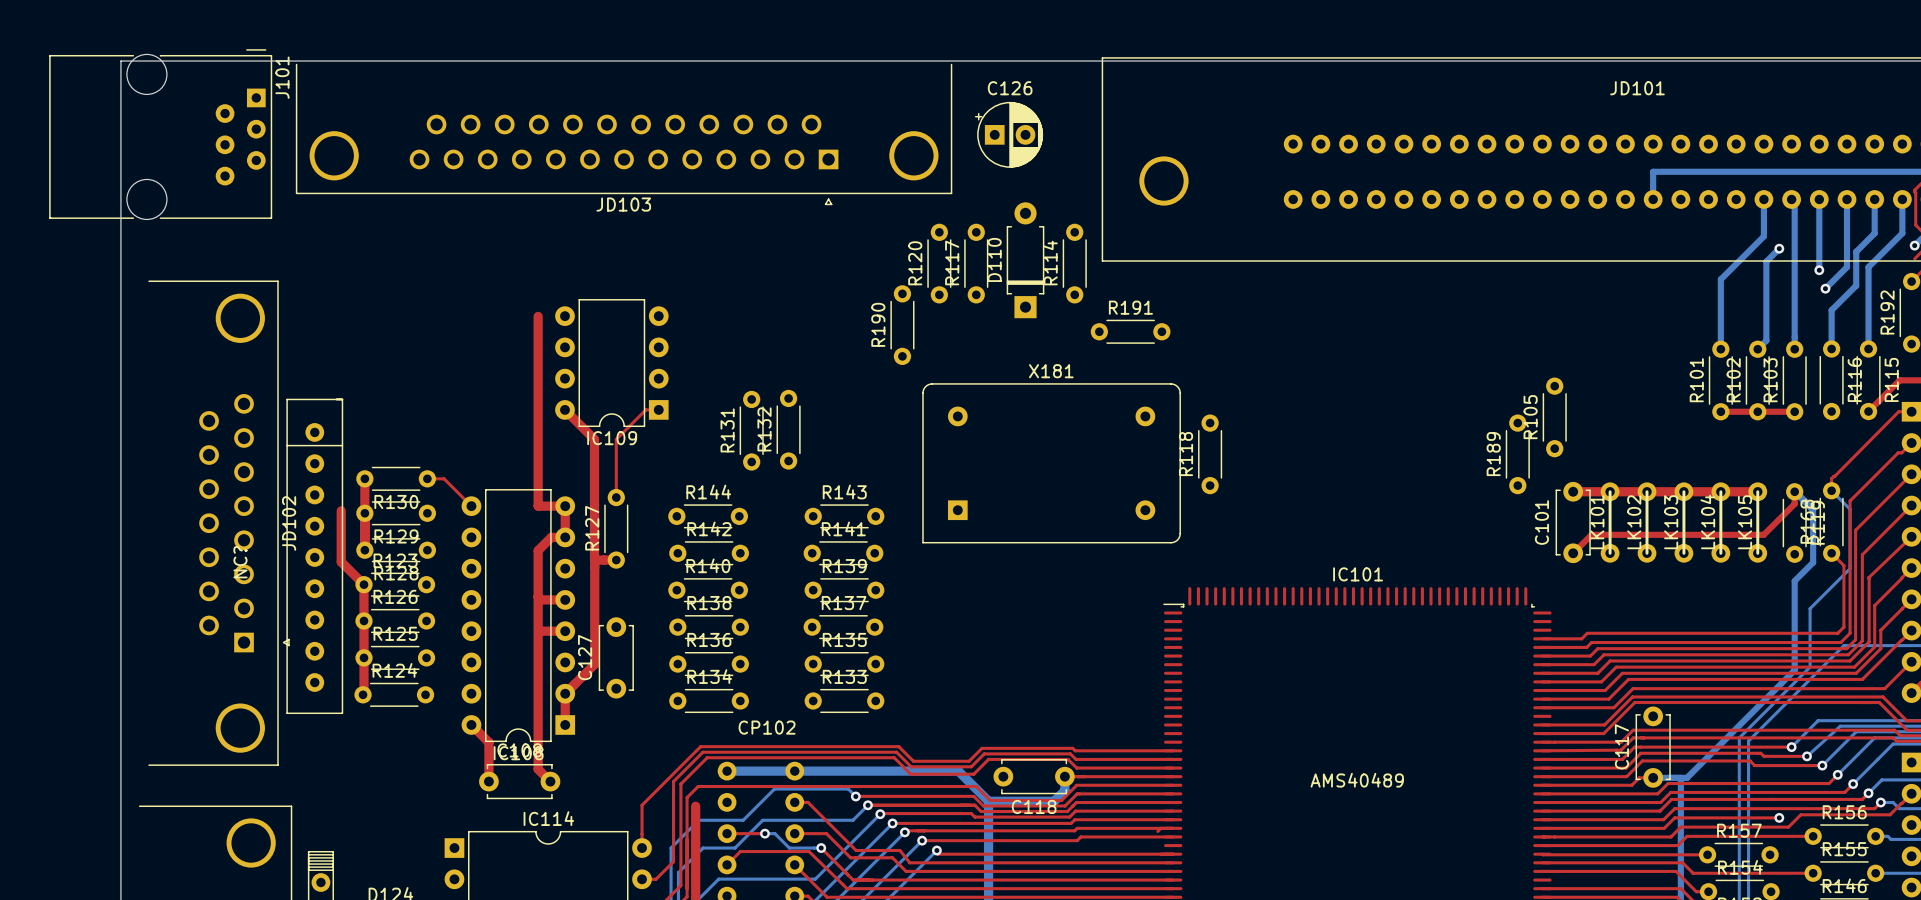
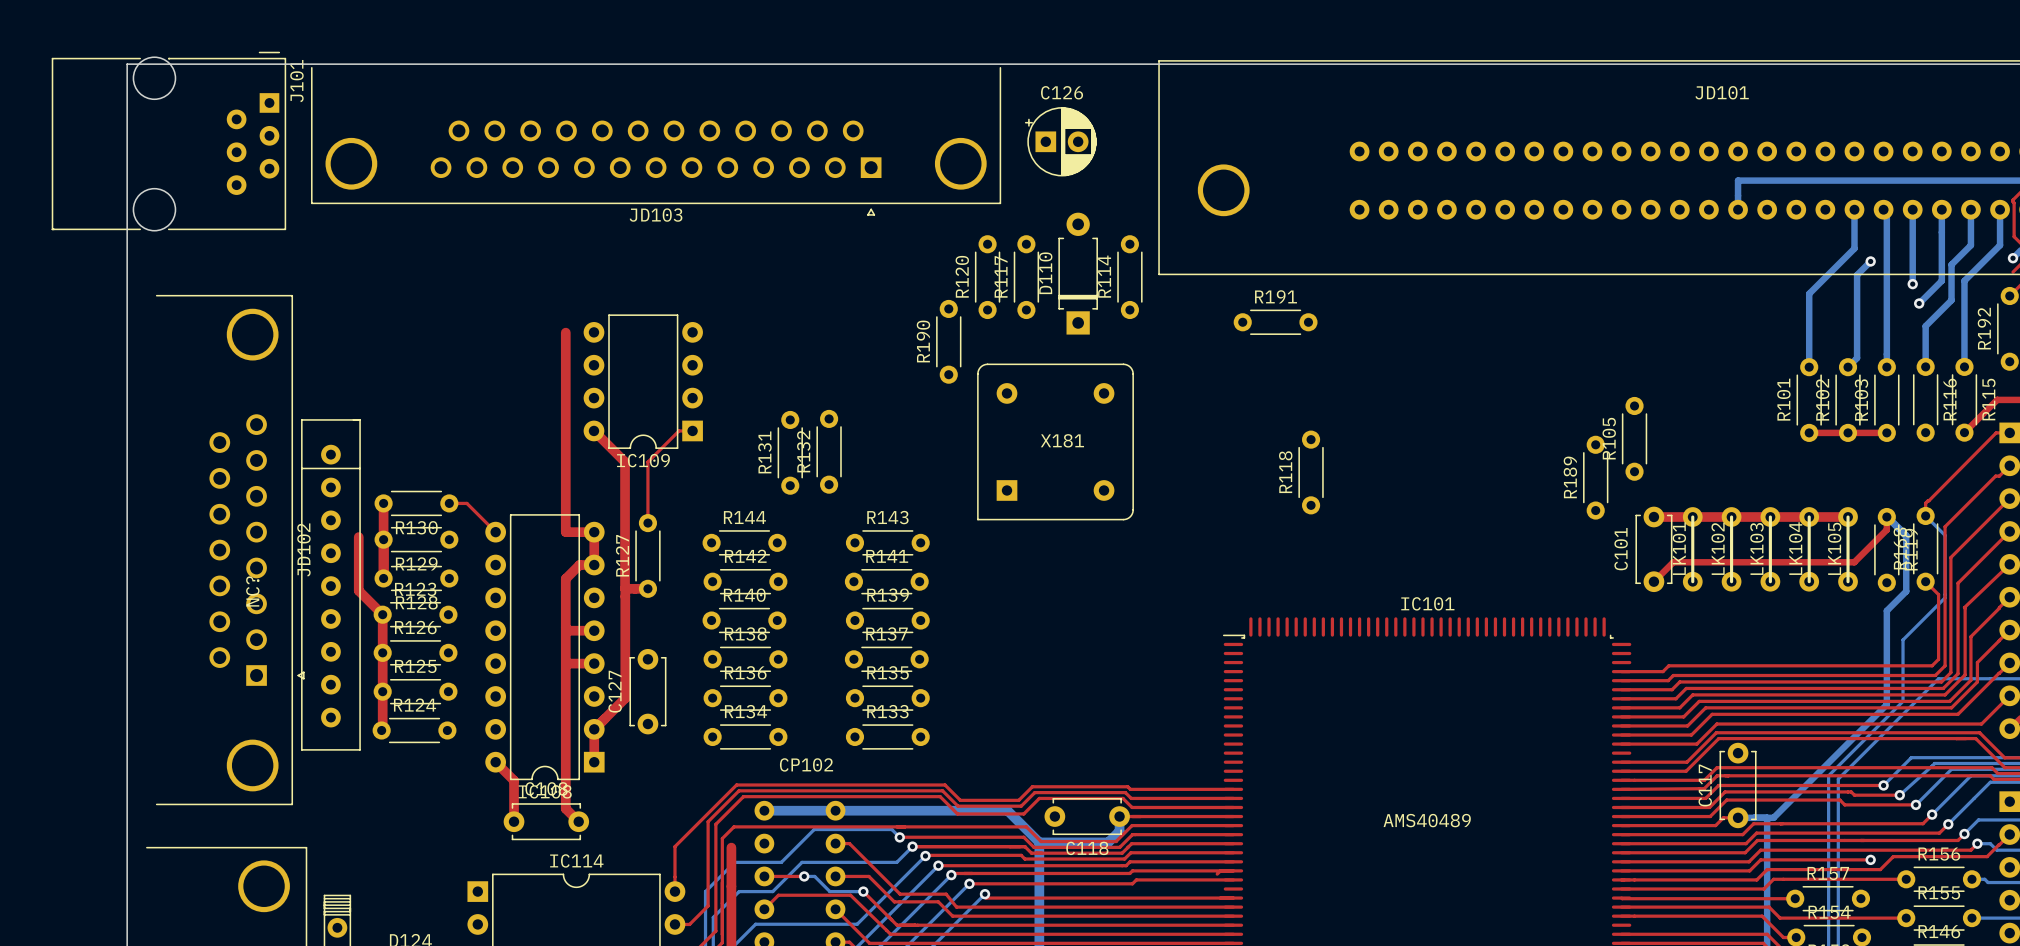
R191 position: (1130, 331) -> (1275, 322)
X181 name position: X181 (1051, 371) -> X181 (1062, 440)
X181 footprint: [922, 383, 1181, 544] -> [977, 363, 1134, 521]
R118 position: (1210, 454) -> (1311, 472)

